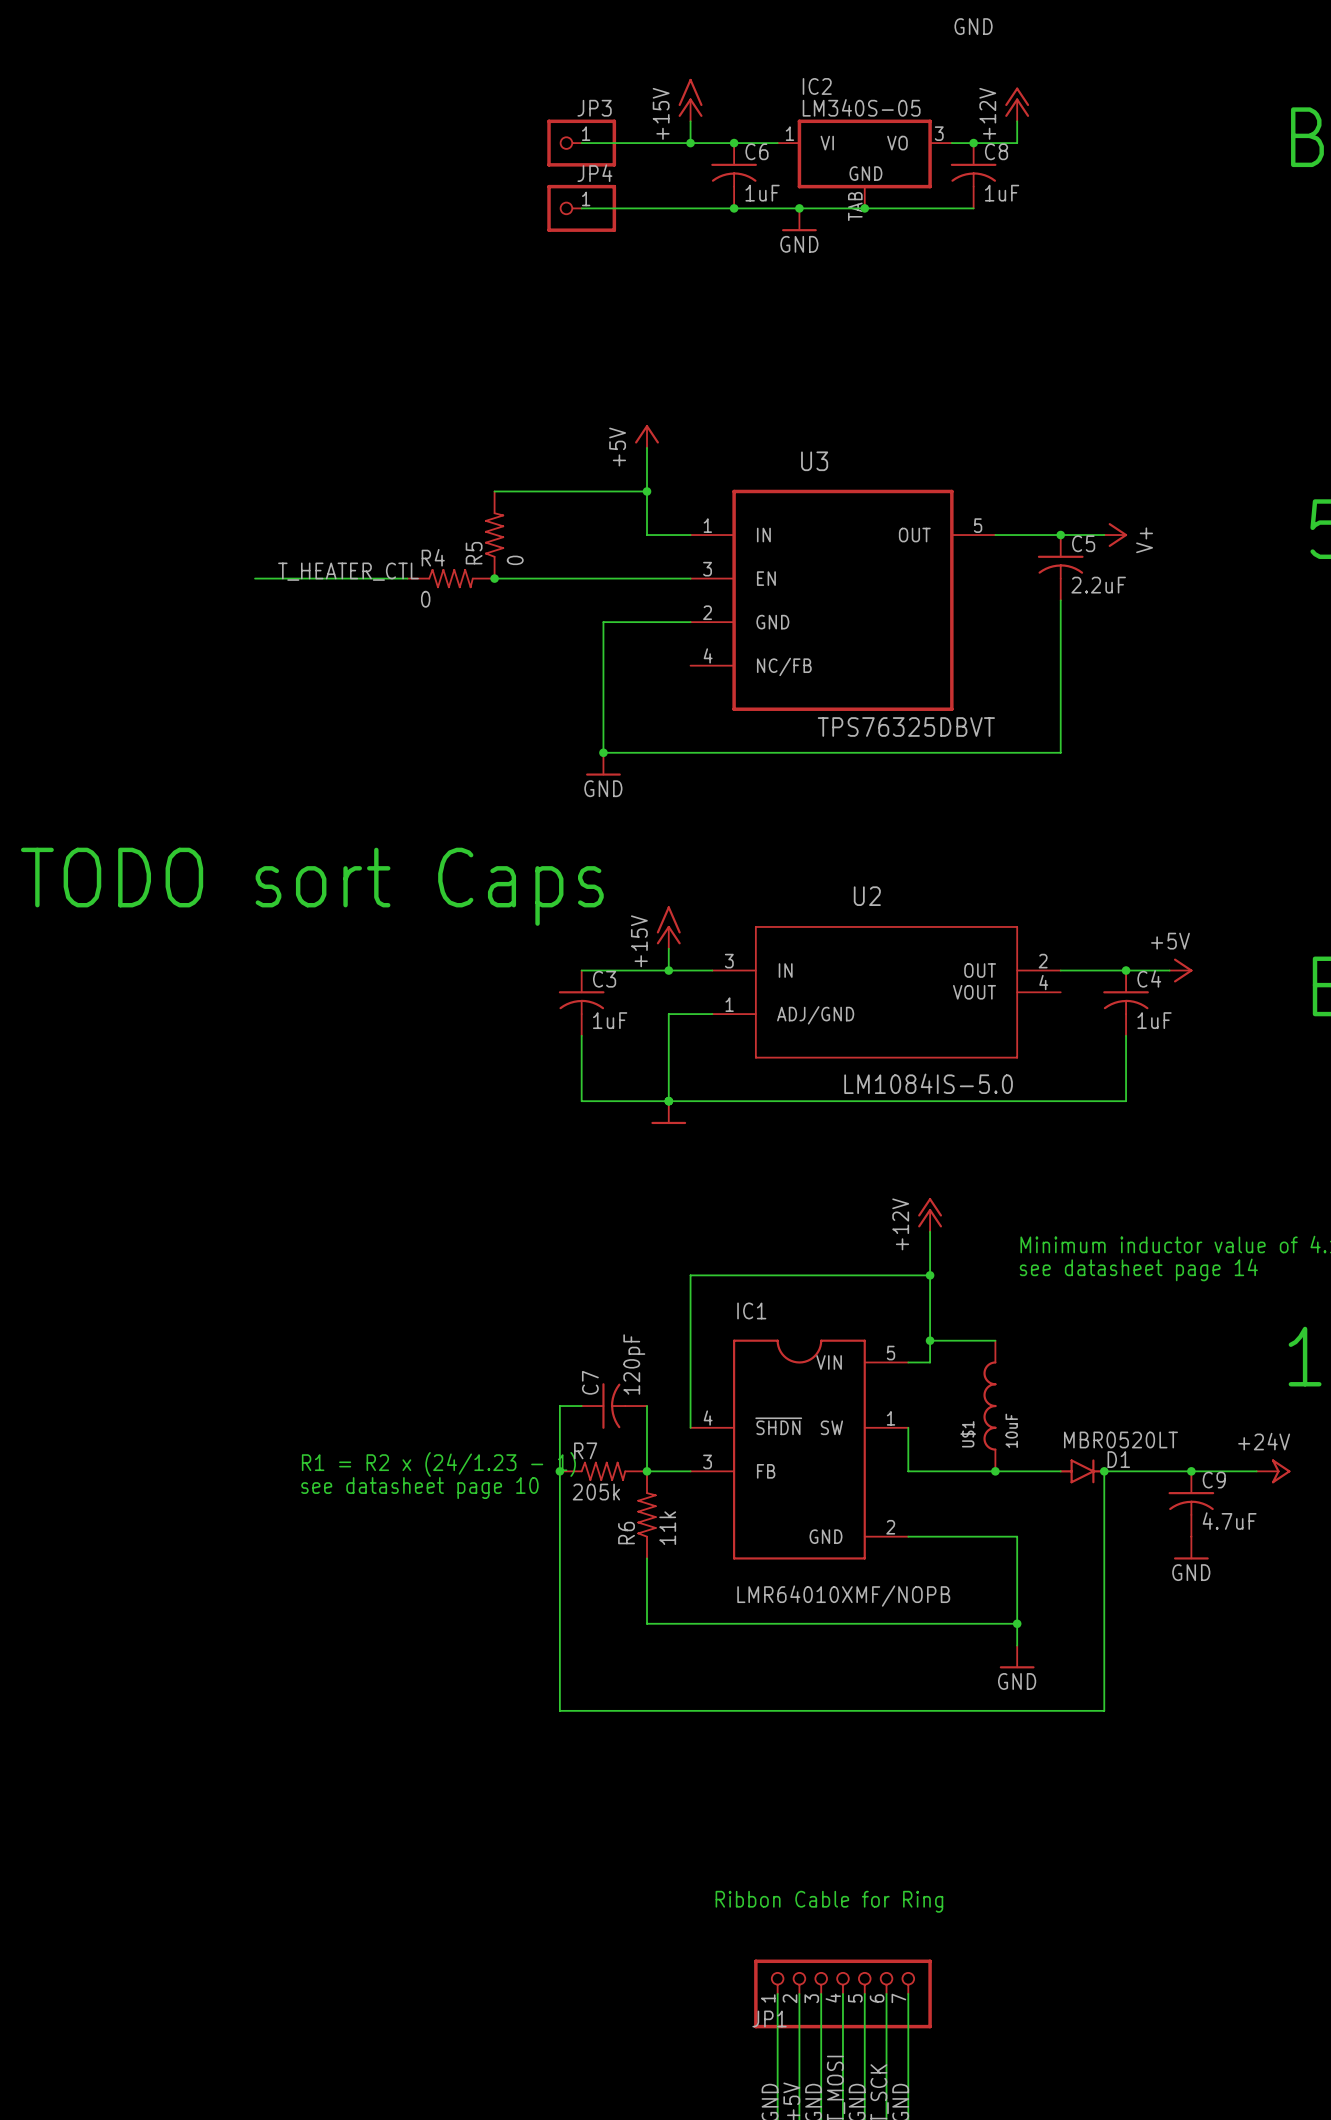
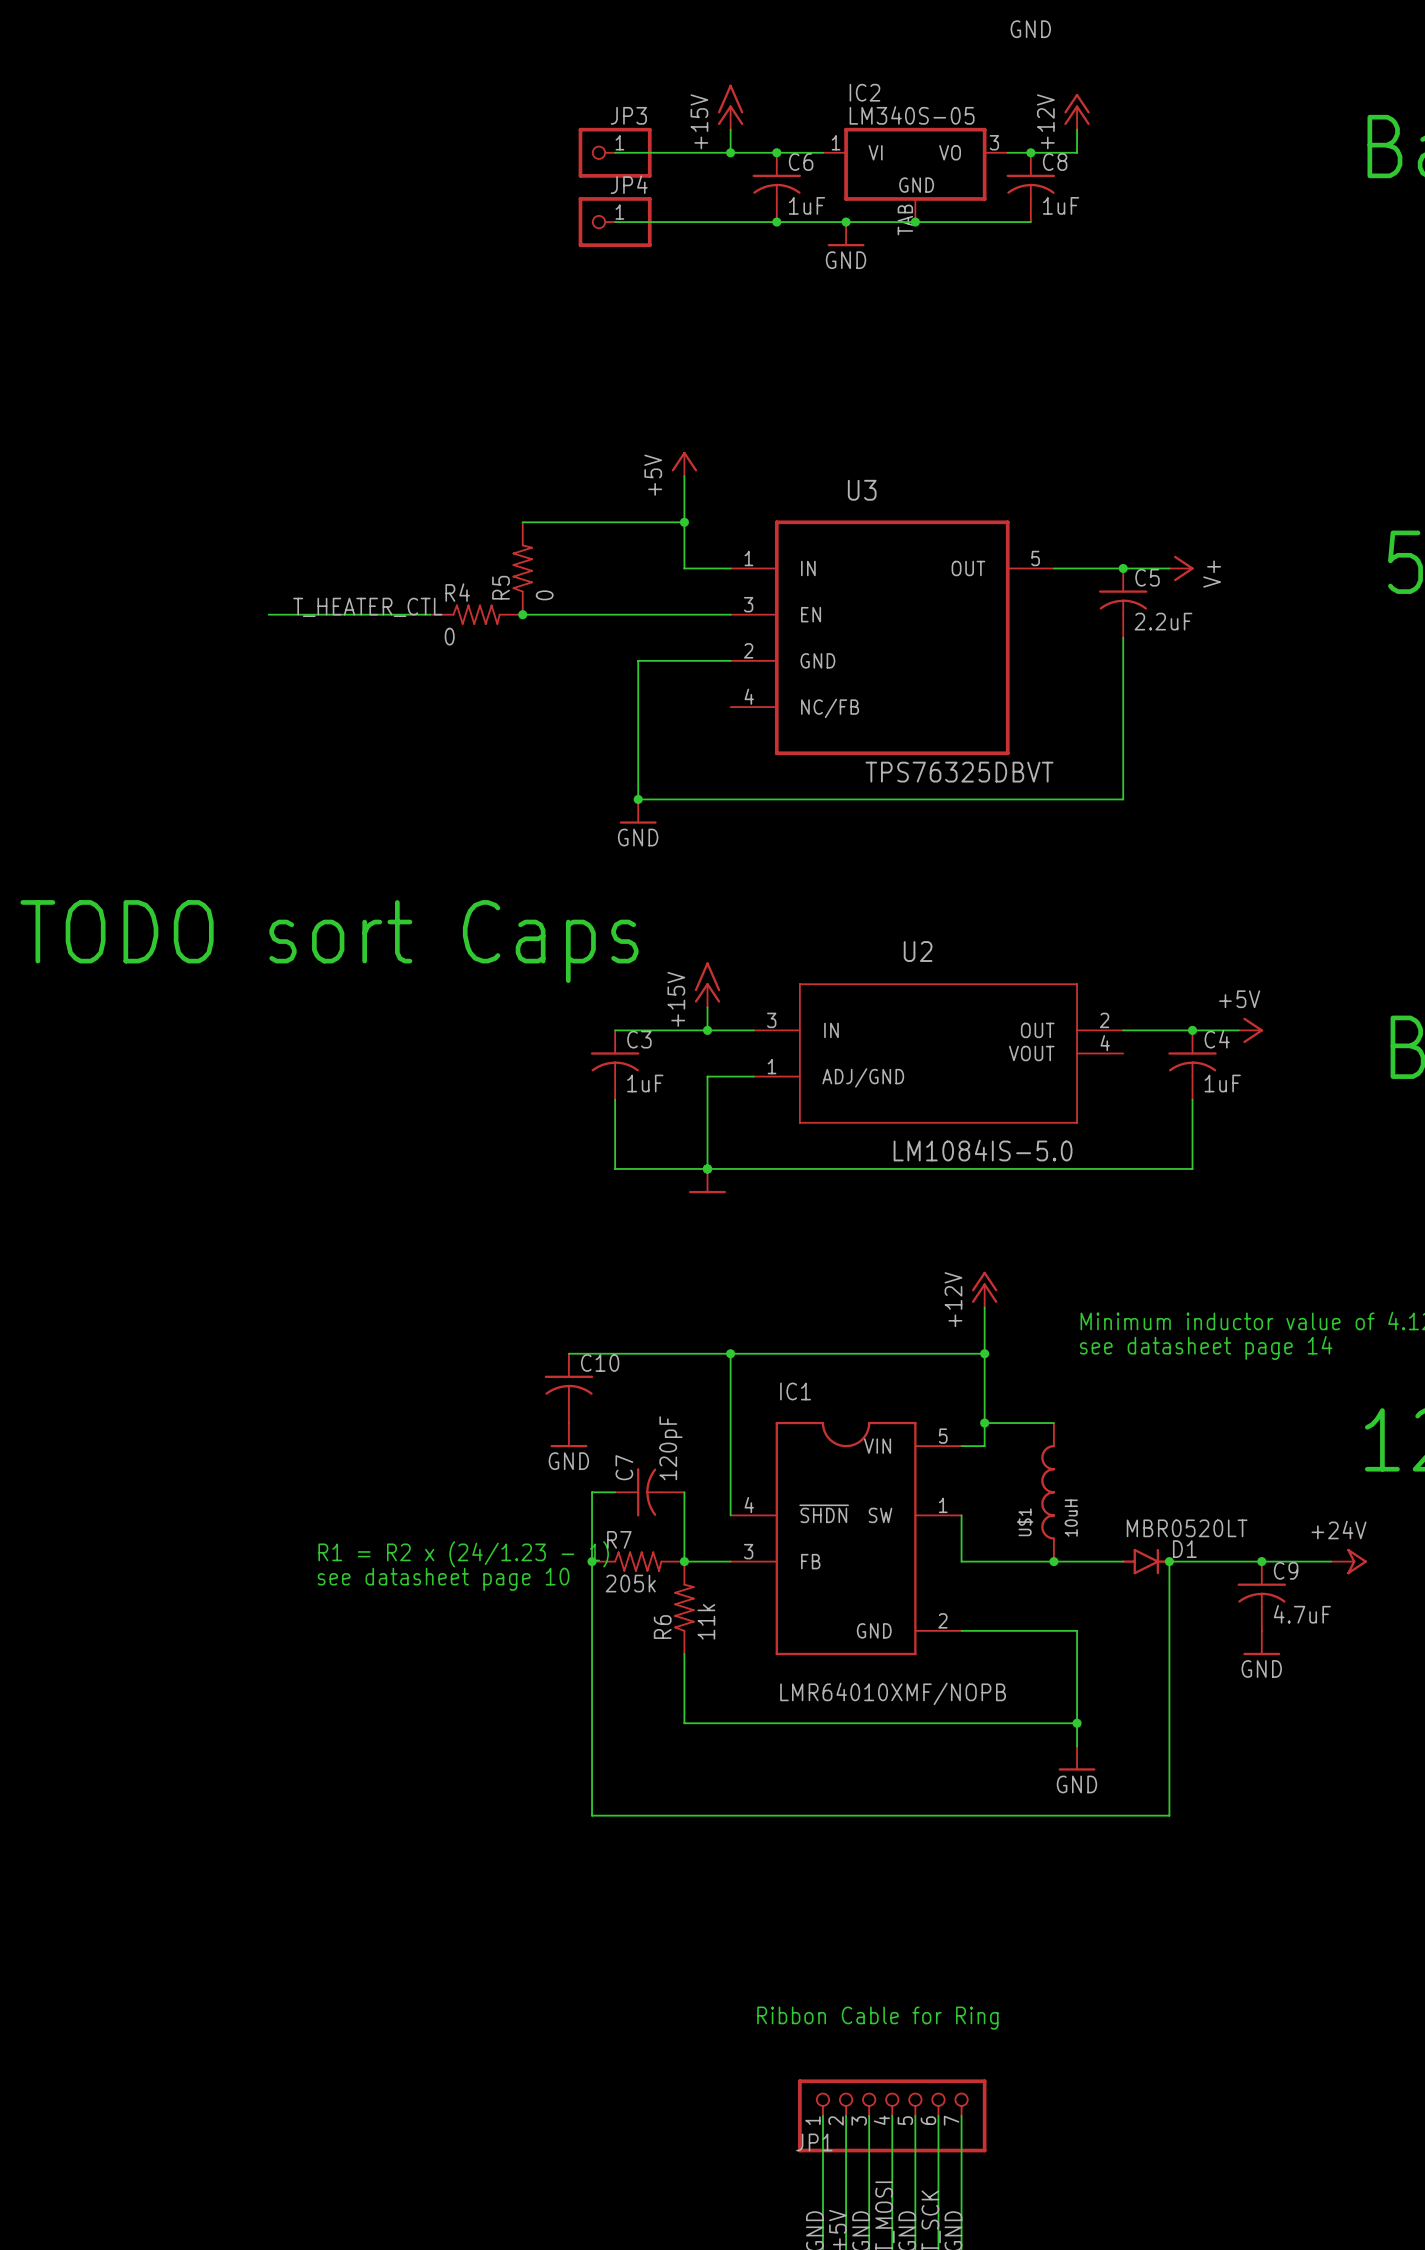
wire: none -> (568, 1353) (730, 1353)
junction: none -> (730, 1353)
C10: none -> (568, 1388)
power symbol: none -> GND (568, 1435)
U$1 value: 10uF (1011, 1430) -> 10uH (1071, 1518)

